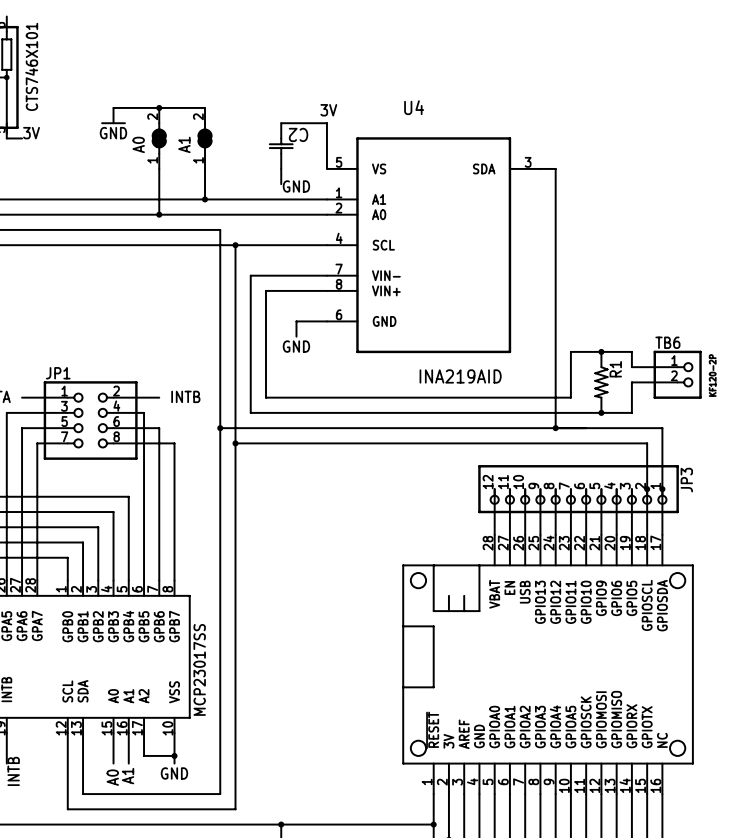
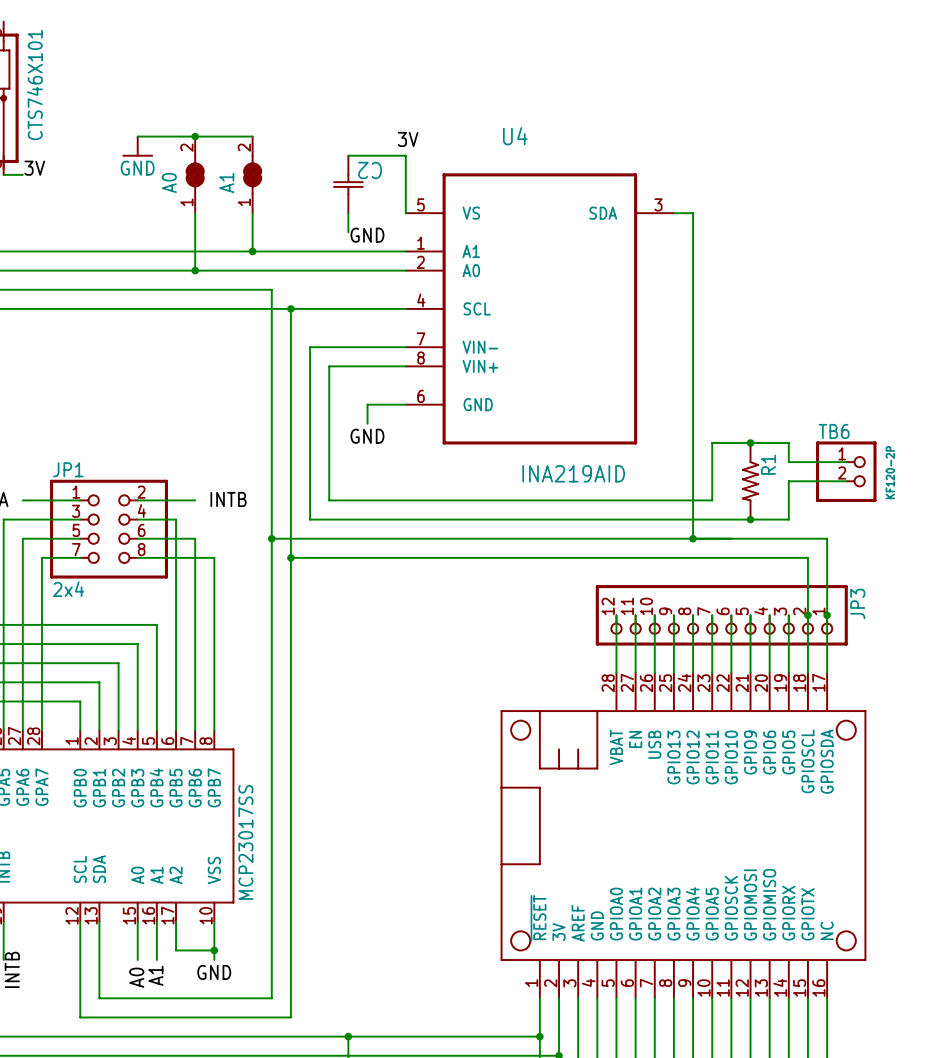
JP1 value: none -> 2x4 (68, 589)

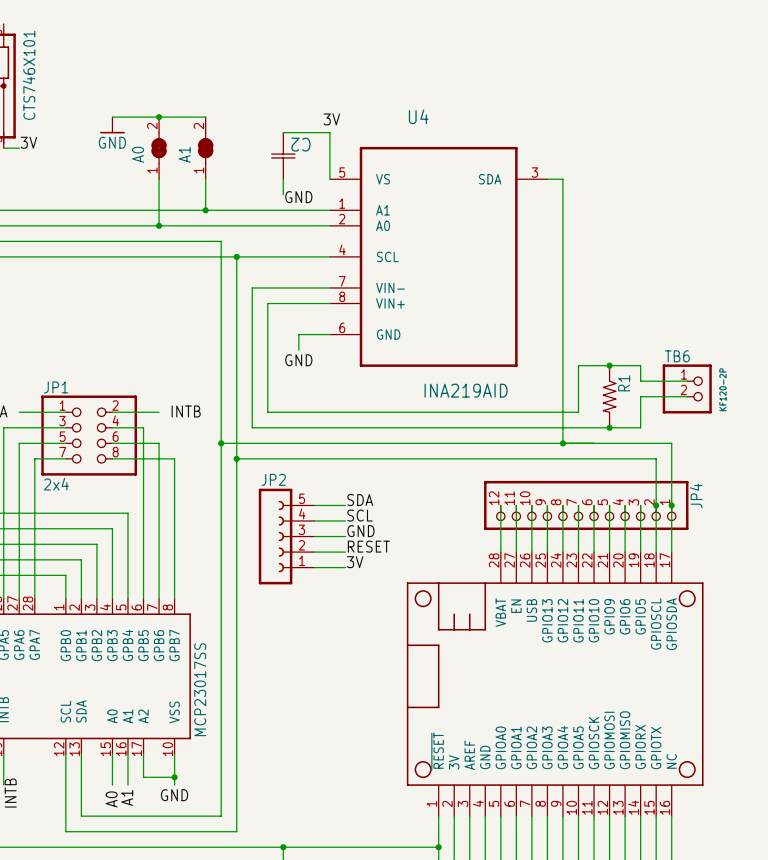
JP3 name: JP3 (857, 603) -> JP4 (696, 496)
label: none -> SDA (360, 500)
wire: none -> (314, 505) (345, 505)
label: none -> SCL (360, 515)
wire: none -> (314, 521) (345, 521)
label: none -> GND (360, 531)
JP2: none -> (286, 536)
wire: none -> (314, 536) (345, 536)
label: none -> RESET (368, 546)
wire: none -> (314, 552) (345, 552)
label: none -> 3V (355, 562)
wire: none -> (314, 567) (345, 567)

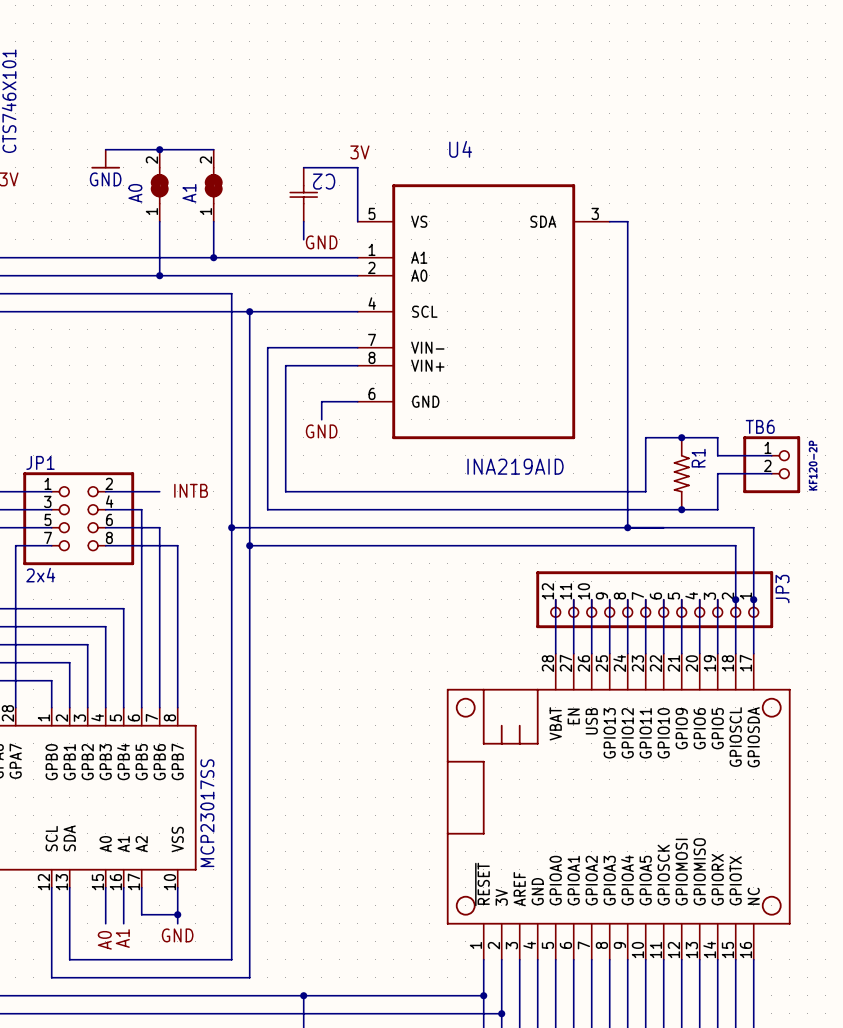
JP4 name: JP4 (696, 496) -> JP3 (782, 589)
label: SDA (360, 500) -> none
wire: (314, 505) (345, 505) -> none
label: SCL (360, 515) -> none
wire: (314, 521) (345, 521) -> none
label: GND (360, 531) -> none
JP2: (286, 536) -> none
wire: (314, 536) (345, 536) -> none
label: RESET (368, 546) -> none
wire: (314, 552) (345, 552) -> none
label: 3V (355, 562) -> none
wire: (314, 567) (345, 567) -> none

